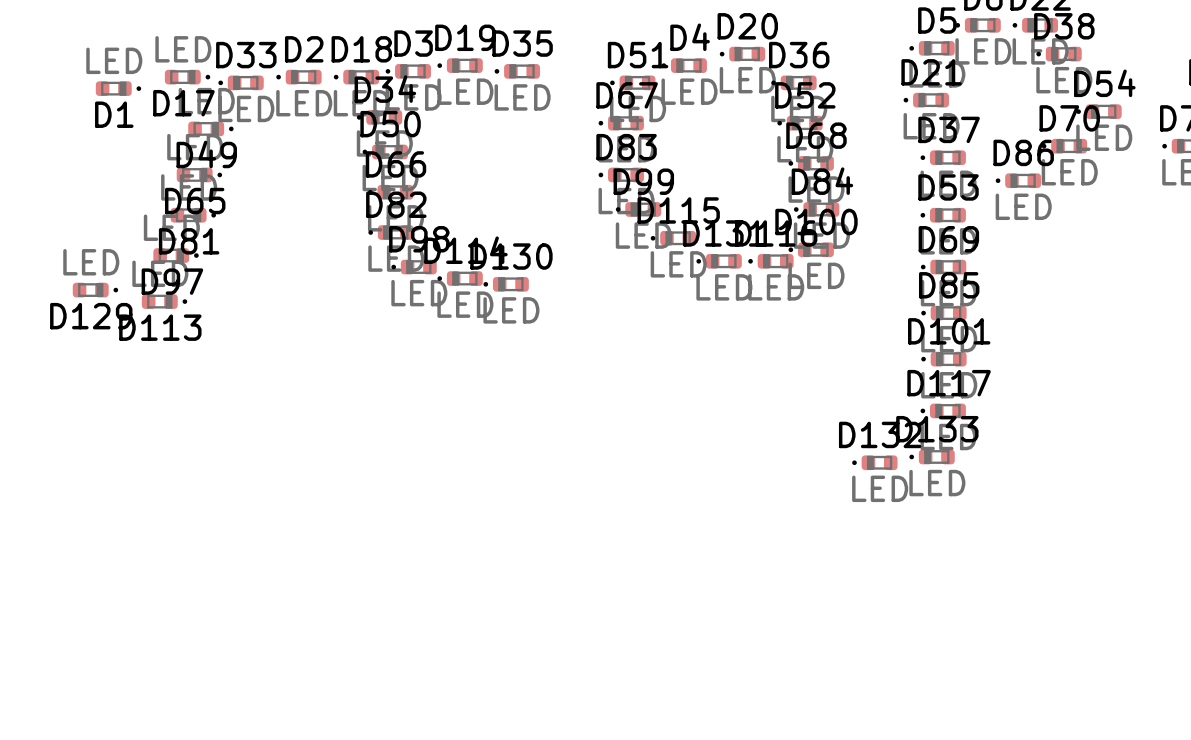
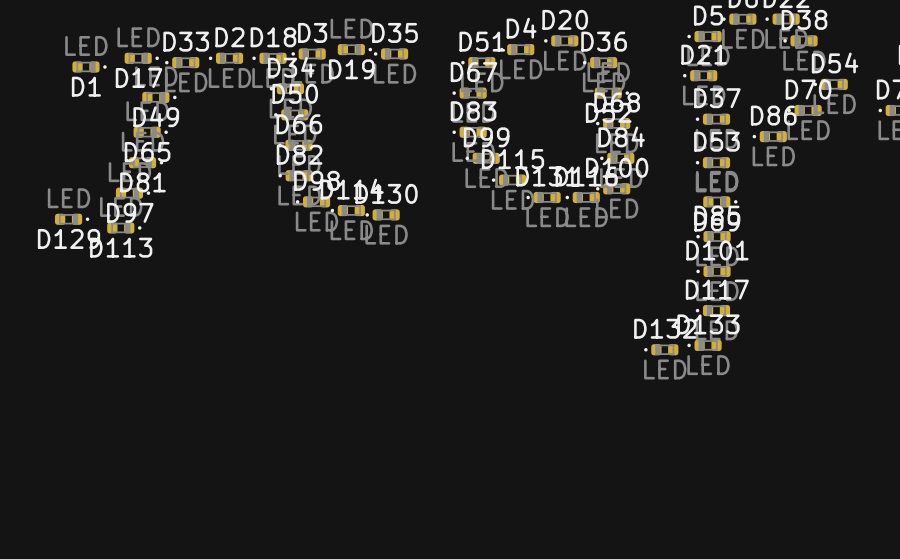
D19 rotation: 0° (460, 65) -> 180° (354, 49)
D52 rotation: 0° (800, 123) -> 180° (611, 93)
D69 rotation: 0° (943, 267) -> 180° (720, 201)

